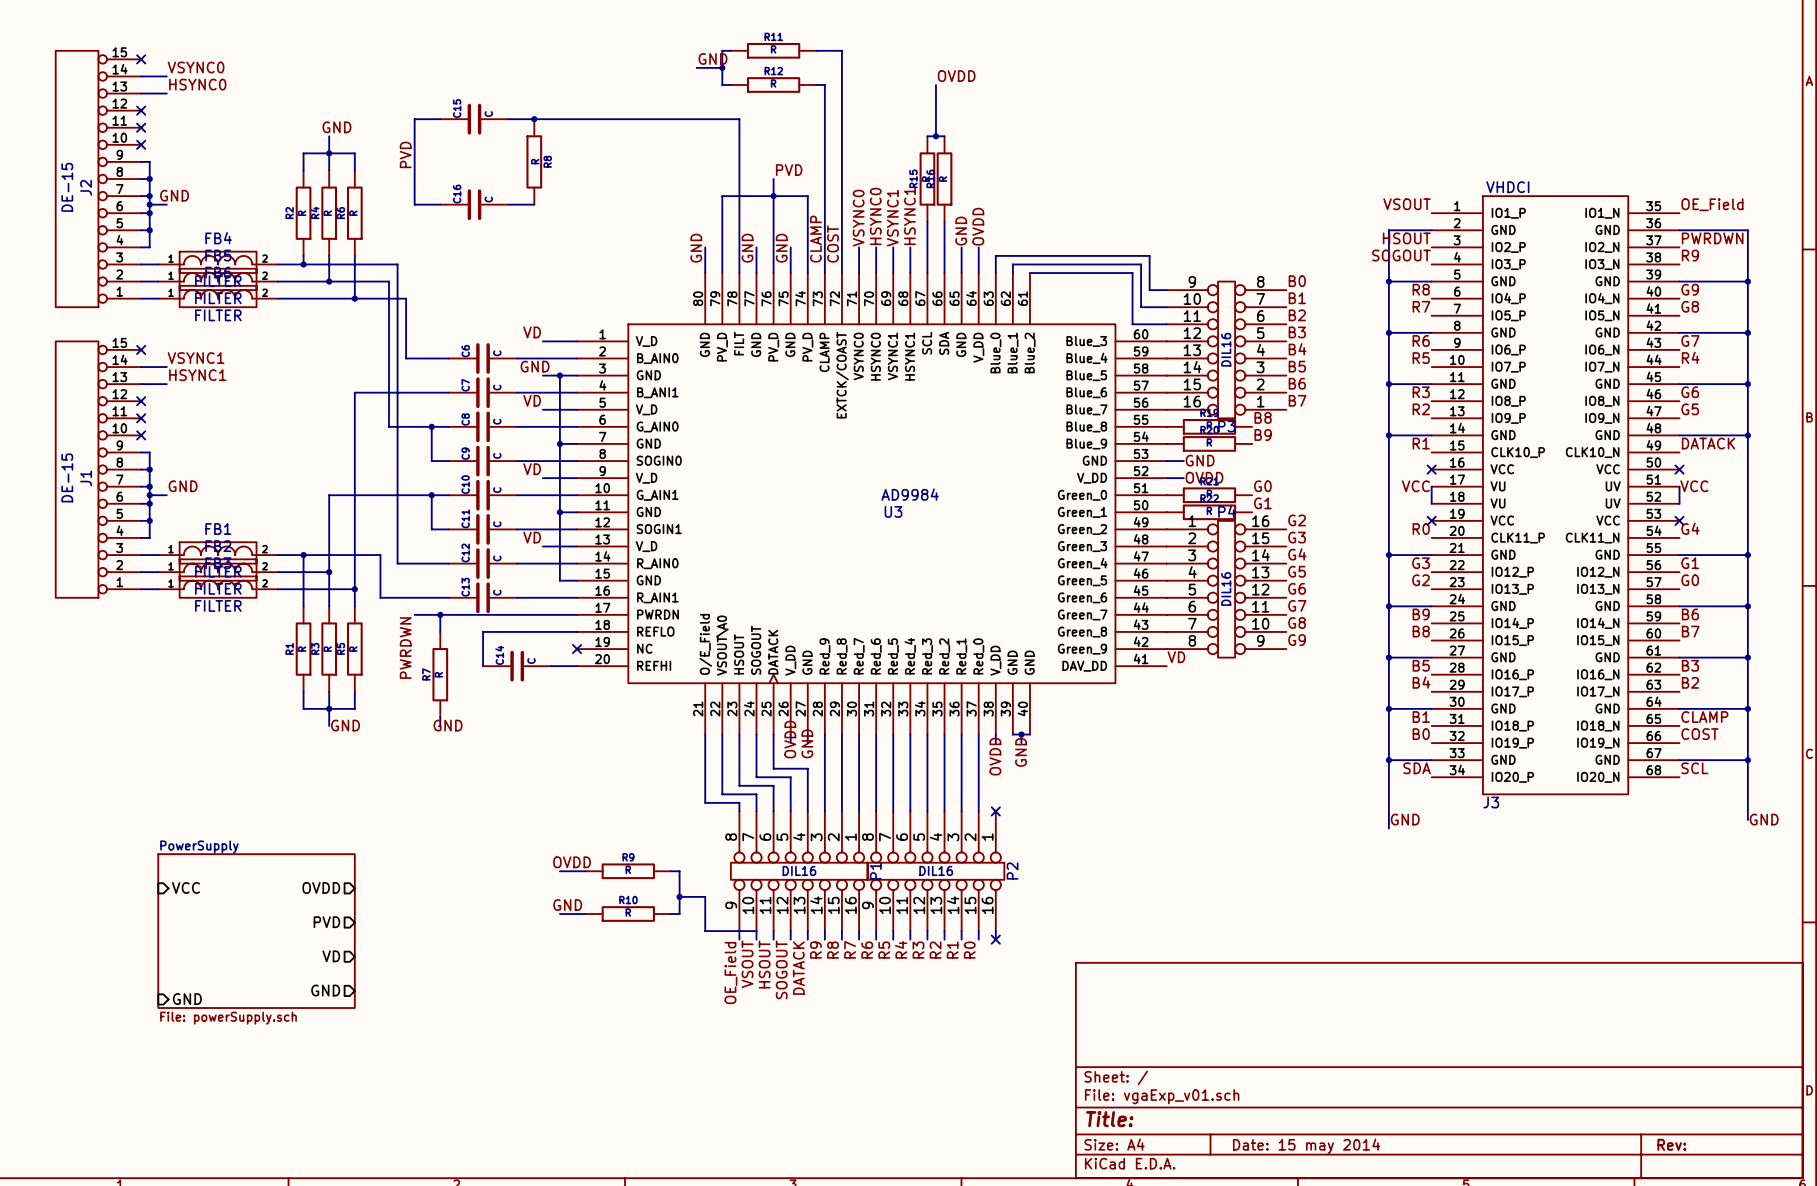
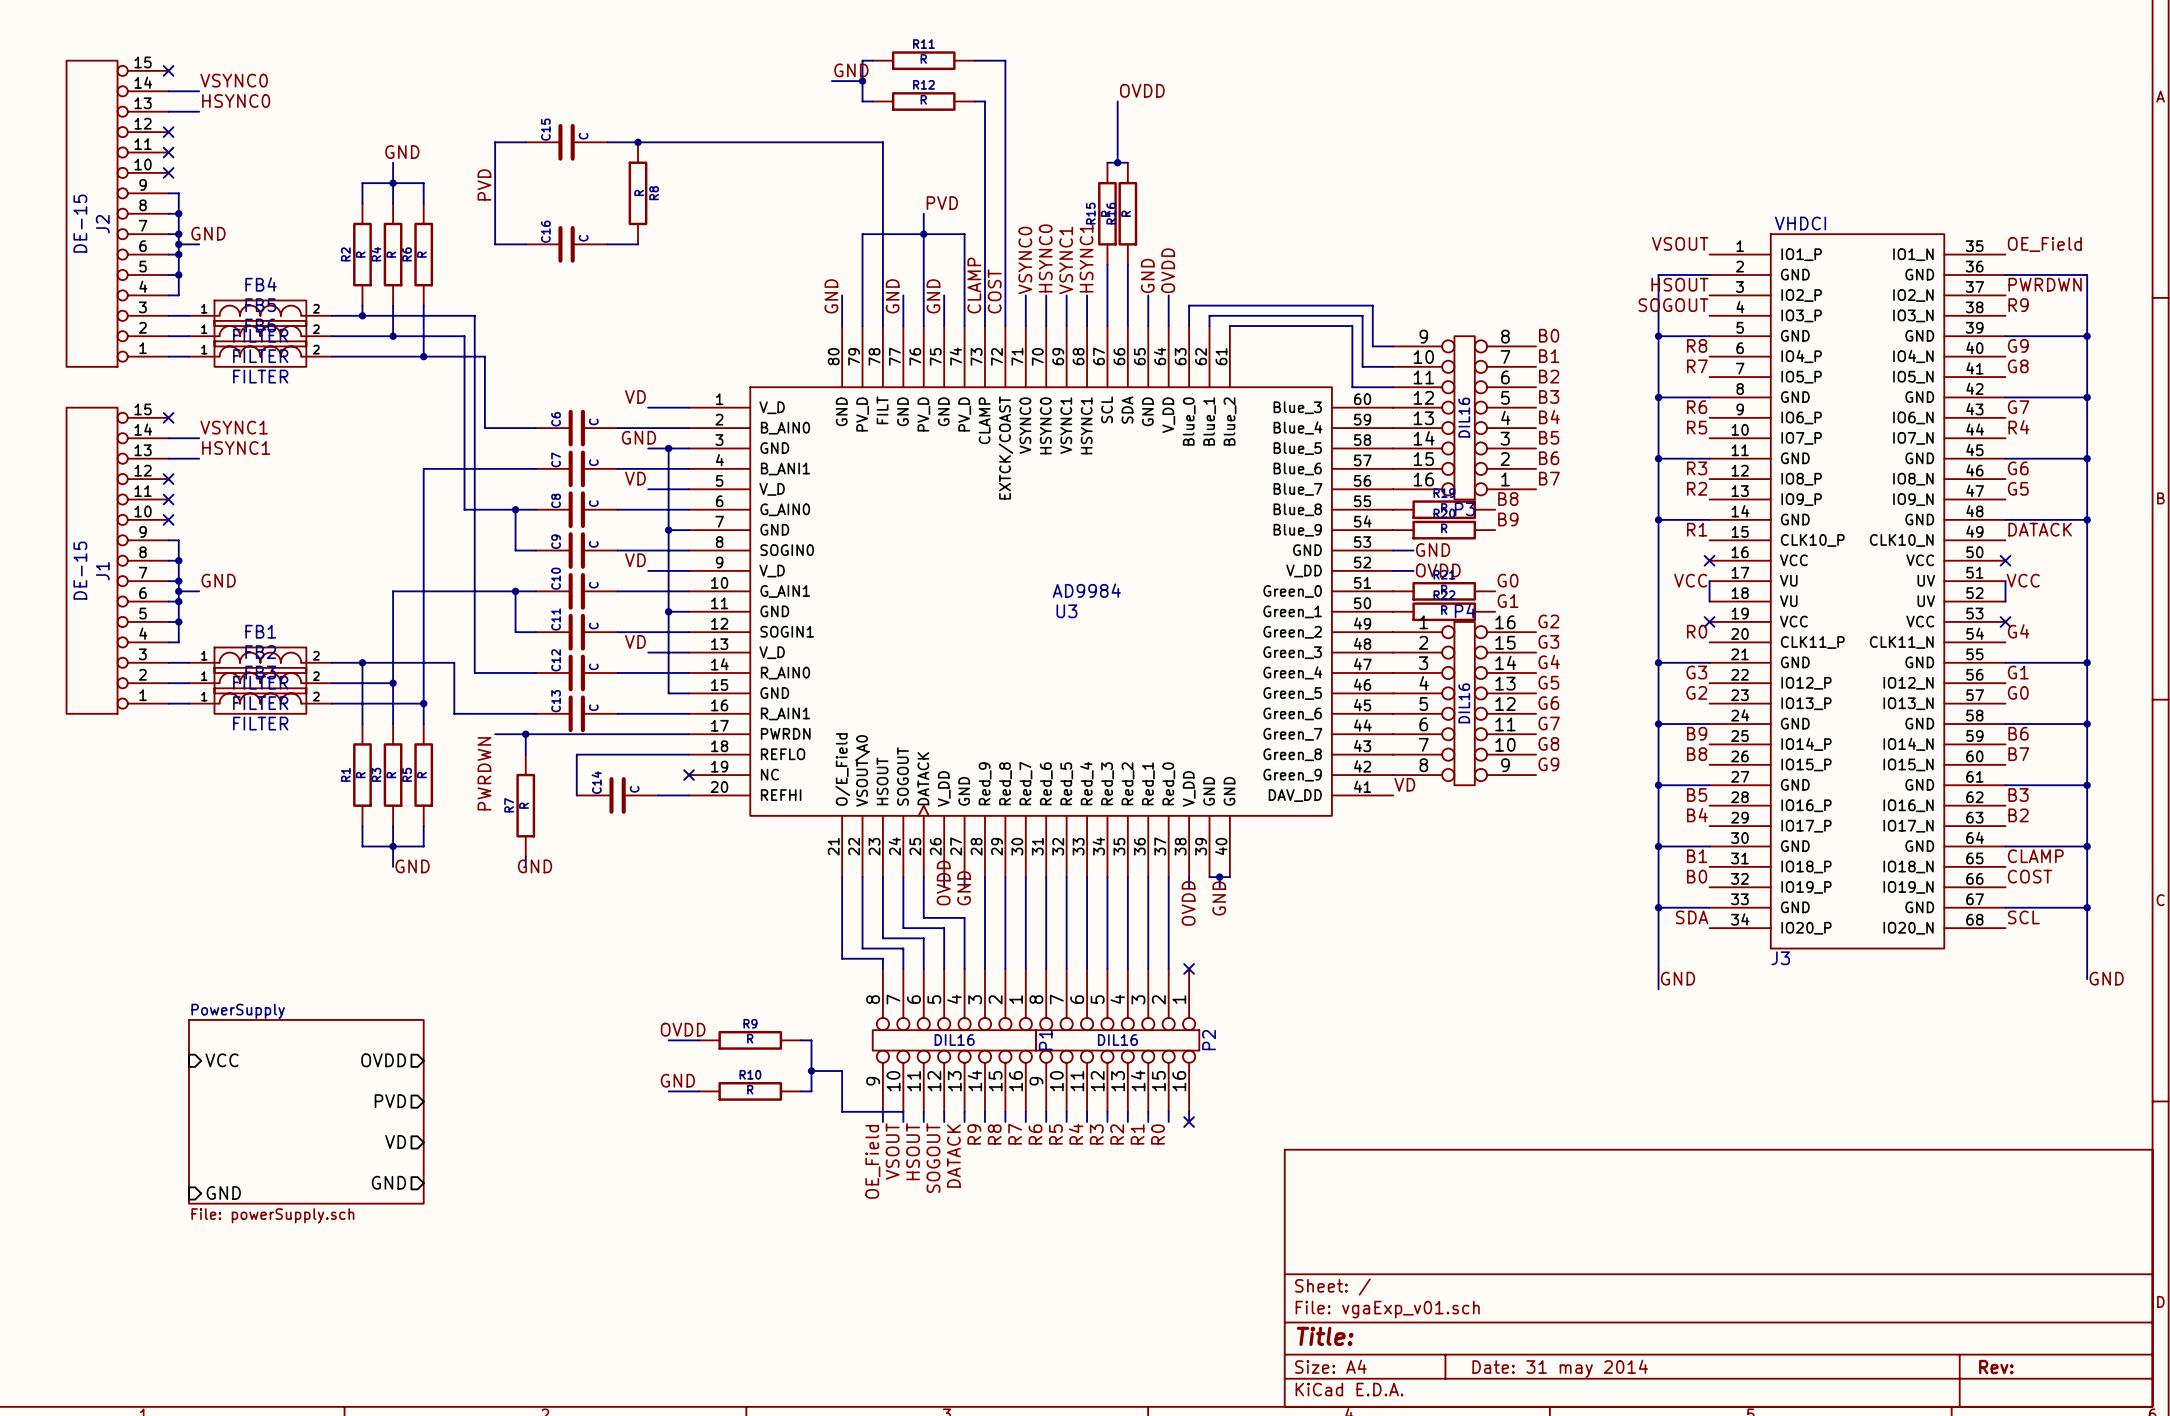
title block: Date: 15 may 2014 (1306, 1146) -> Date: 31 may 2014 (1560, 1368)

